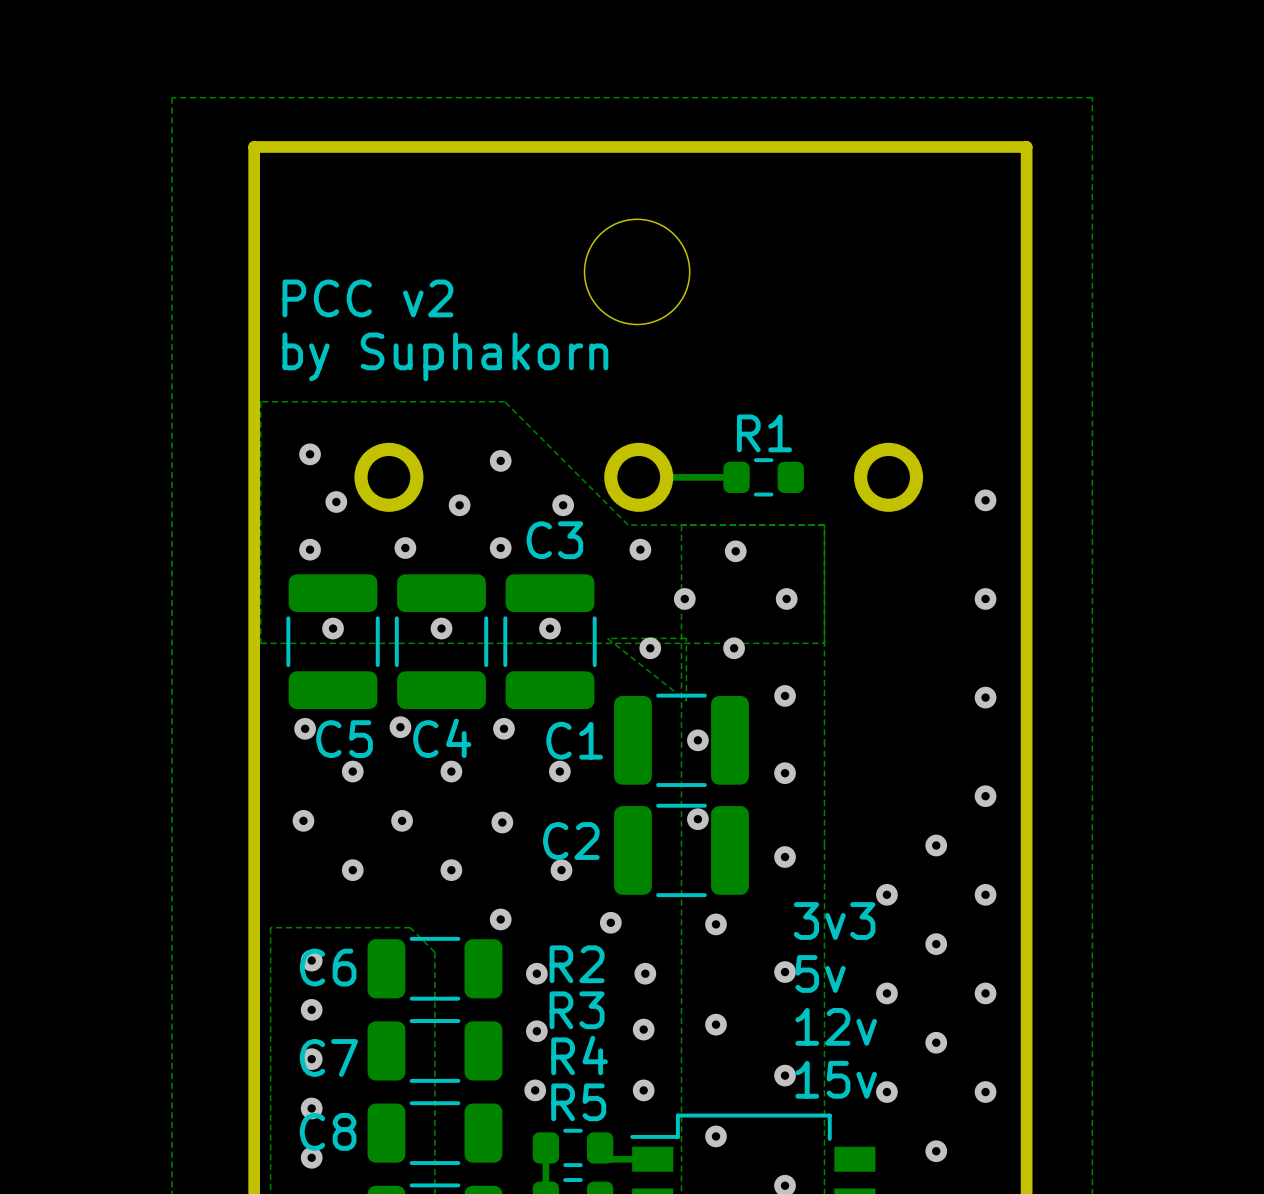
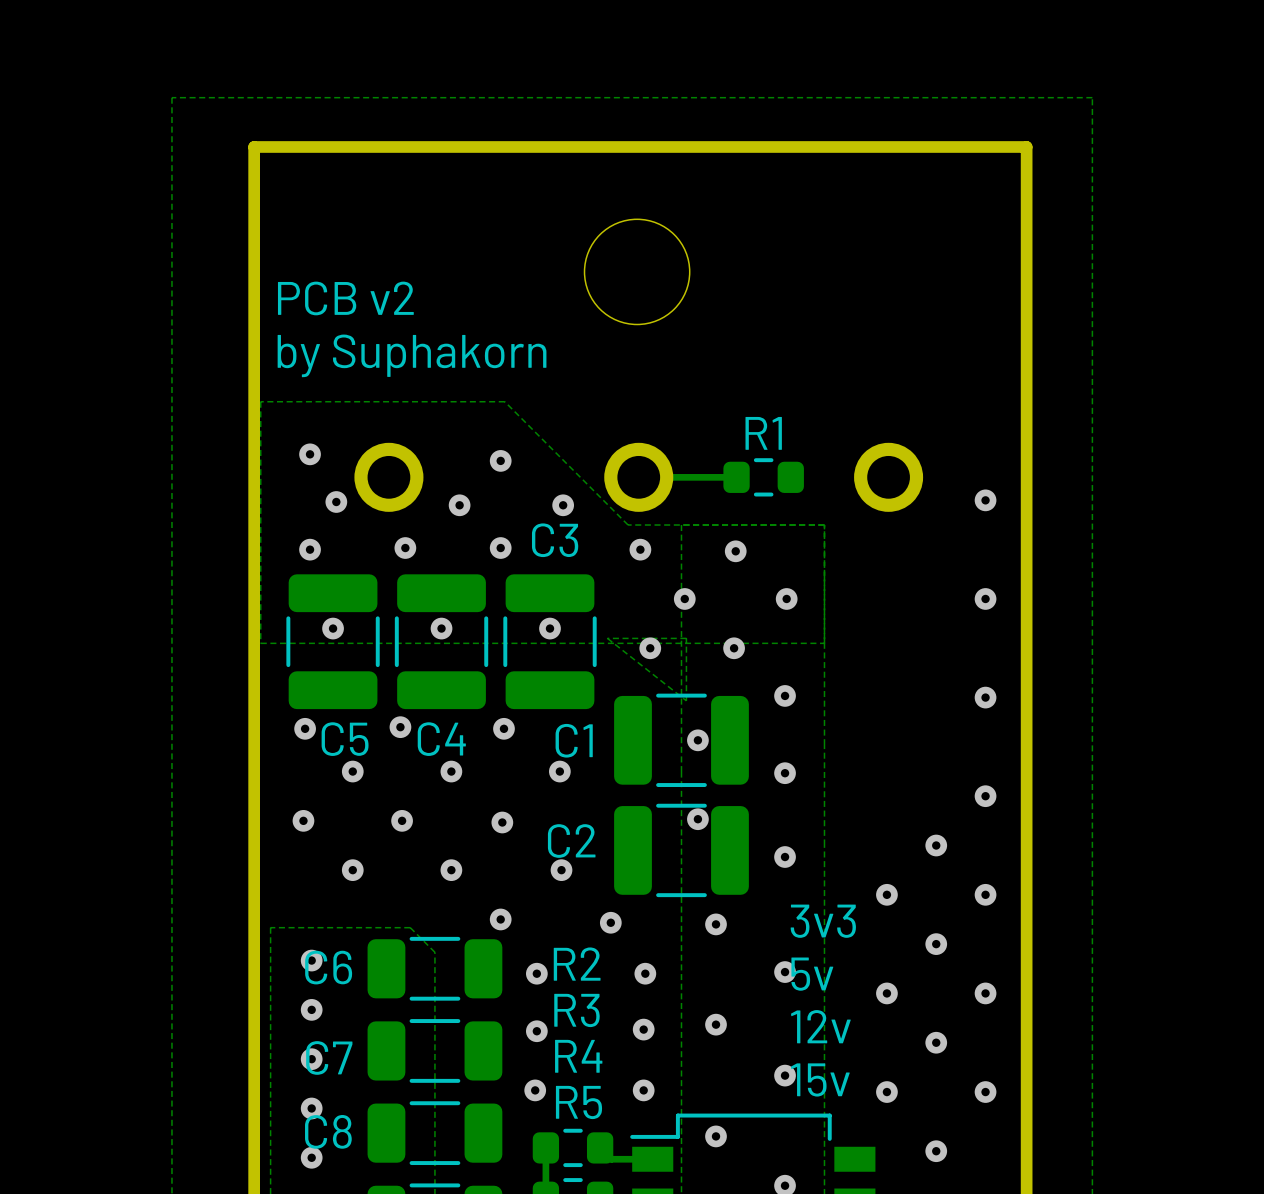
text: PCC v2 (367, 298) -> PCB v2 (345, 298)

